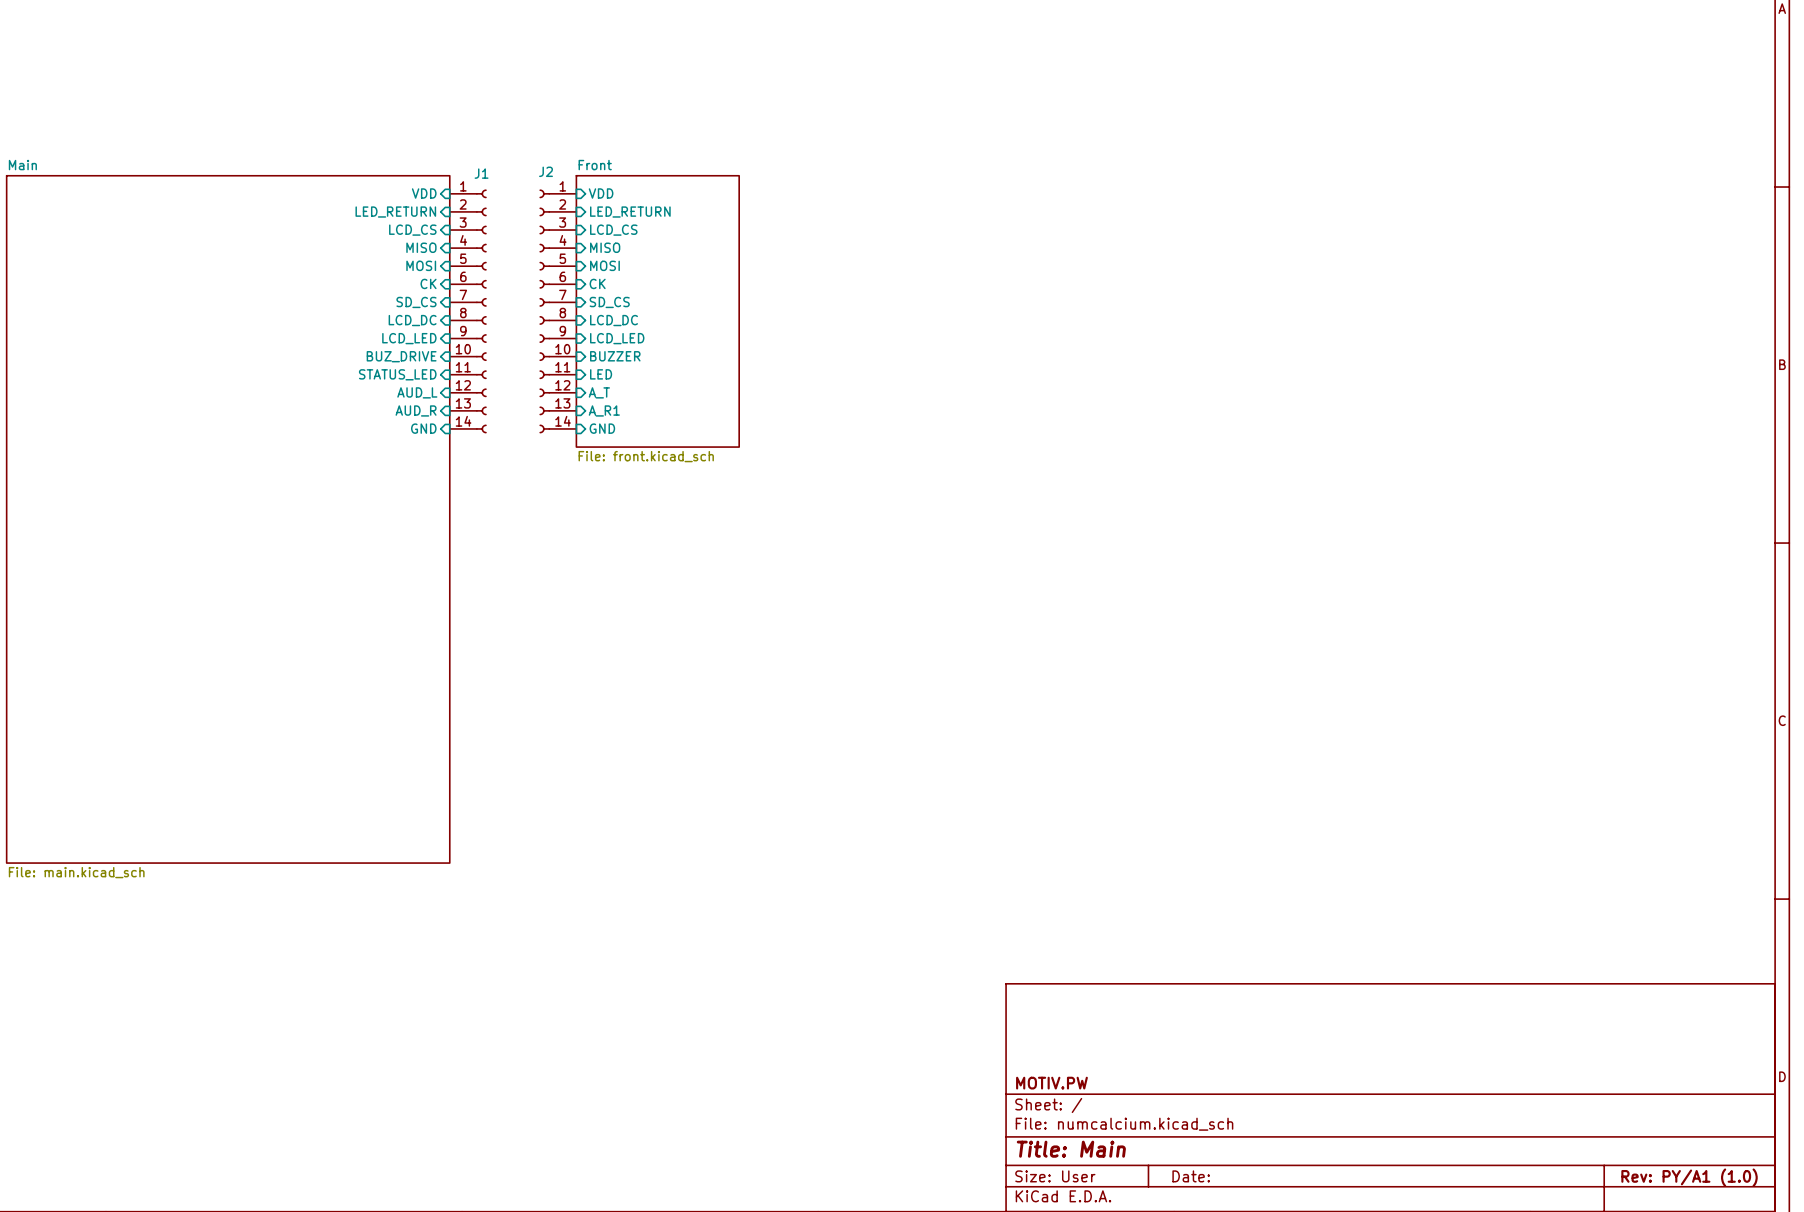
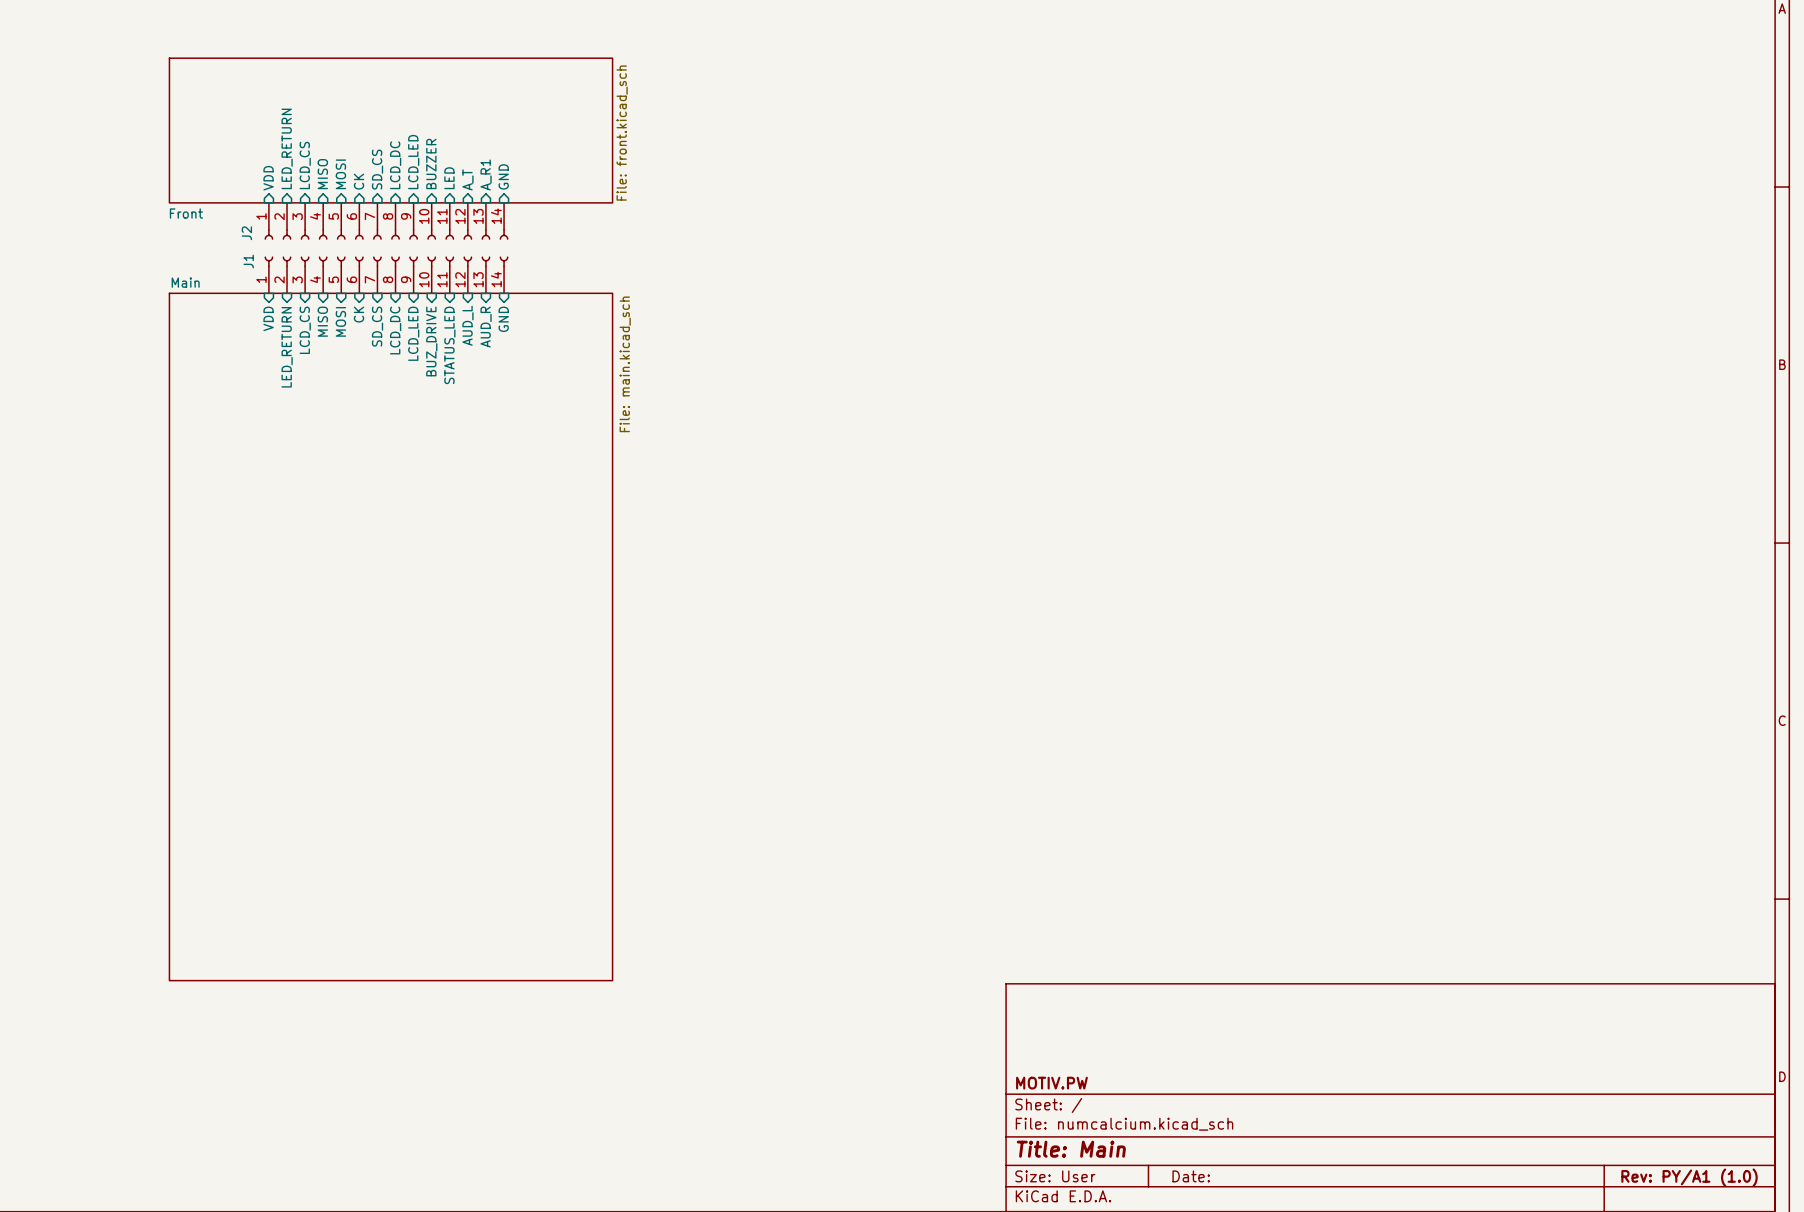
sheet Front: none -> File: front.kicad_sch (391, 130)
sheet pin: none -> LED_RETURN (287, 148)
sheet pin: none -> LCD_LED (413, 162)
sheet pin: none -> BUZZER (431, 163)
sheet pin: none -> LCD_CS (305, 165)
sheet pin: none -> LCD_DC (395, 165)
sheet pin: none -> SD_CS (377, 169)
sheet pin: none -> MISO (322, 174)
sheet pin: none -> MOSI (340, 174)
sheet pin: none -> A_R1 (486, 174)
sheet pin: none -> GND (503, 176)
sheet pin: none -> VDD (268, 178)
sheet pin: none -> LED (449, 178)
sheet pin: none -> A_T (467, 179)
sheet pin: none -> CK (359, 181)
sheet pin: VDD (424, 193) -> none
sheet pin: VDD (601, 193) -> none
sheet pin: LED_RETURN (395, 212) -> none
sheet pin: LED_RETURN (630, 212) -> none
sheet pin: LCD_CS (412, 230) -> none
sheet pin: LCD_CS (613, 230) -> none
sheet pin: MISO (421, 247) -> none
sheet pin: MISO (605, 247) -> none
sheet pin: MOSI (421, 265) -> none
sheet pin: MOSI (604, 265) -> none
sheet pin: CK (428, 283) -> none
sheet pin: CK (597, 283) -> none
sheet pin rotation: 0° (416, 302) -> 90° counterclockwise (377, 326)
sheet pin: SD_CS (609, 302) -> none
J1 rotation: 0° (481, 311) -> 90° counterclockwise (386, 261)
J2 rotation: 0° (544, 311) -> 90° counterclockwise (386, 234)
J2 position: (558, 311) -> (386, 221)
sheet Front: File: front.kicad_sch (657, 311) -> none
sheet pin: none -> CK (359, 314)
sheet pin: none -> VDD (268, 318)
sheet pin: none -> GND (503, 319)
sheet pin rotation: 0° (412, 320) -> 90° counterclockwise (395, 330)
sheet pin: LCD_DC (613, 320) -> none
sheet pin: none -> MISO (322, 321)
sheet pin: none -> MOSI (340, 321)
sheet pin: none -> LCD_CS (305, 330)
sheet pin rotation: 0° (409, 338) -> 90° counterclockwise (413, 333)
sheet pin: LCD_LED (617, 338) -> none
sheet pin: none -> LED_RETURN (287, 347)
sheet pin rotation: 0° (401, 356) -> 90° counterclockwise (431, 341)
sheet pin: BUZZER (615, 356) -> none
sheet pin rotation: 0° (397, 374) -> 90° counterclockwise (449, 345)
sheet pin: LED (601, 374) -> none
sheet pin rotation: 0° (417, 392) -> 90° counterclockwise (467, 325)
sheet pin position: AUD_L (417, 392) -> AUD_L (467, 325)
sheet pin: A_T (599, 392) -> none
sheet pin rotation: 0° (416, 410) -> 90° counterclockwise (486, 327)
sheet pin position: AUD_R (416, 410) -> AUD_R (486, 327)
sheet pin: A_R1 (604, 410) -> none
sheet pin: GND (423, 428) -> none
sheet pin: GND (602, 428) -> none
sheet Main: File: main.kicad_sch (228, 519) -> none
sheet Main: none -> File: main.kicad_sch (391, 636)

